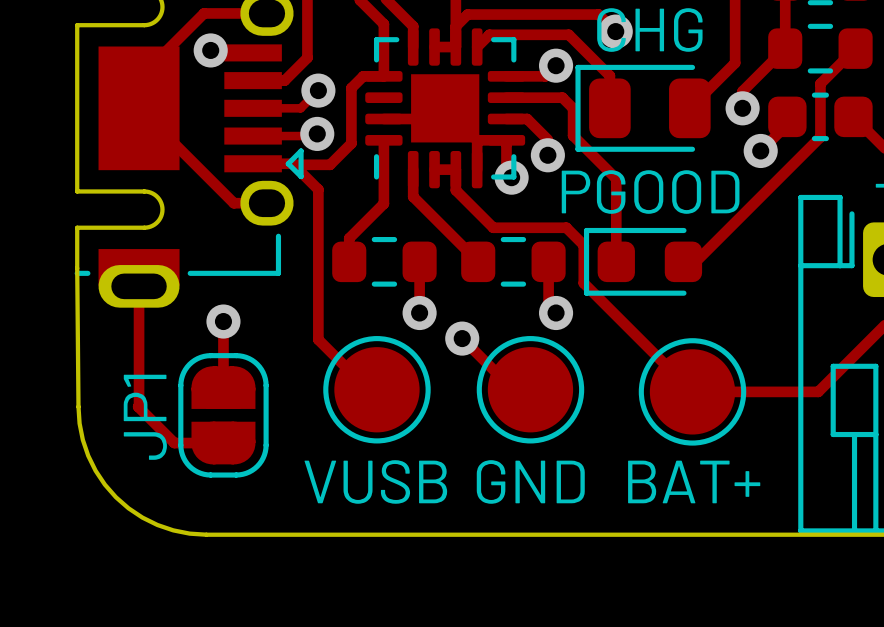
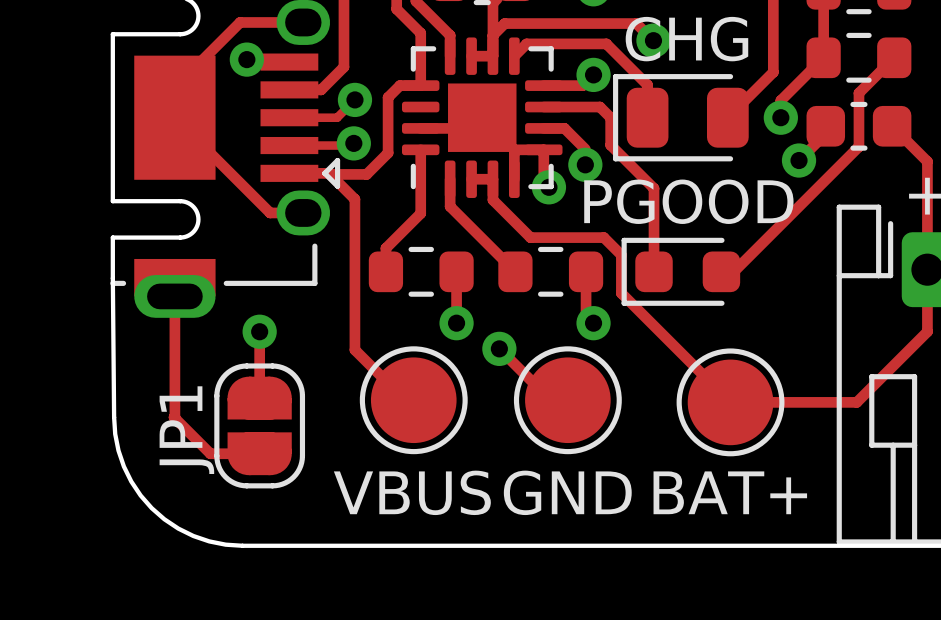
part value: VUSB (375, 481) -> VBUS (412, 492)

